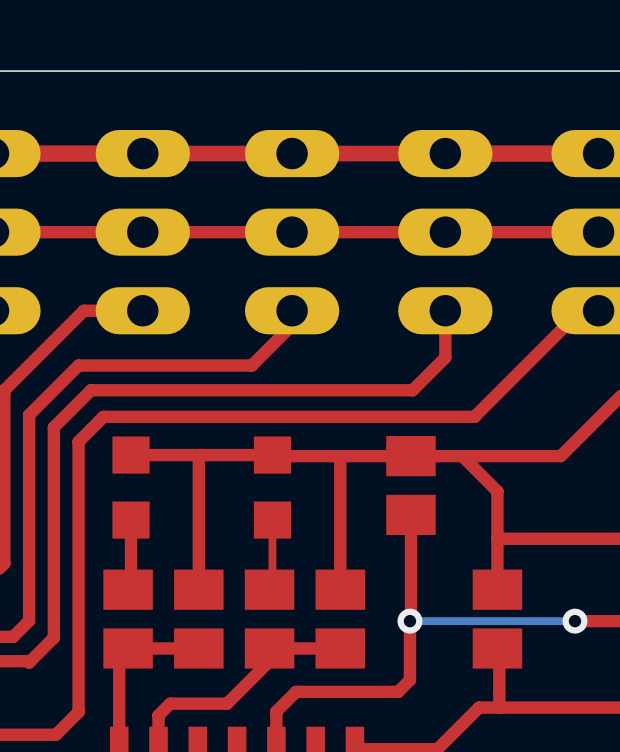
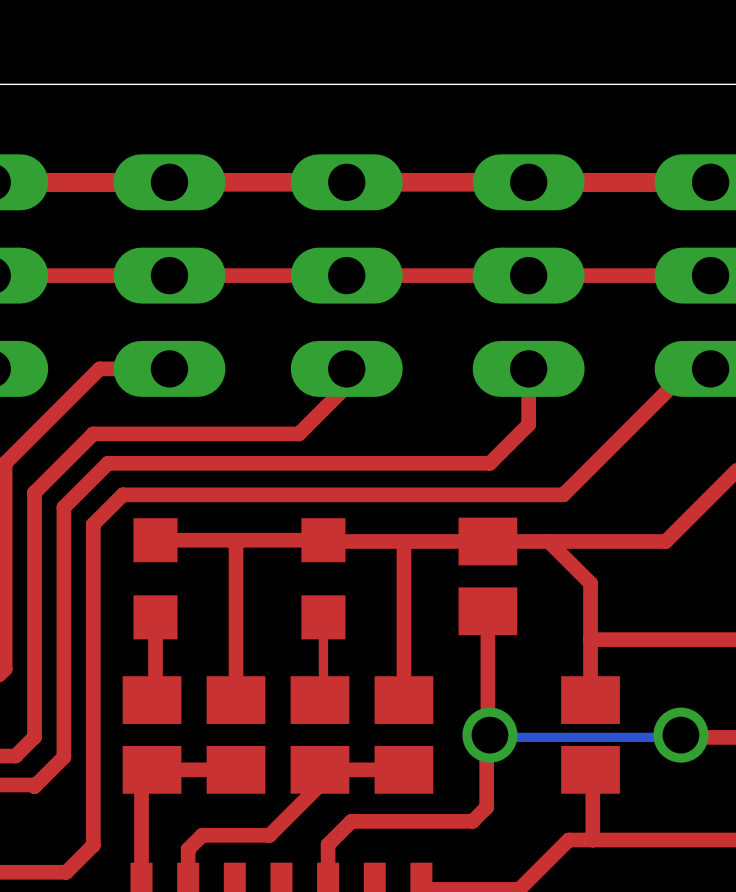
via size: [397, 608, 423, 634] -> [462, 707, 518, 763]
via size: [562, 608, 588, 634] -> [653, 707, 709, 763]

